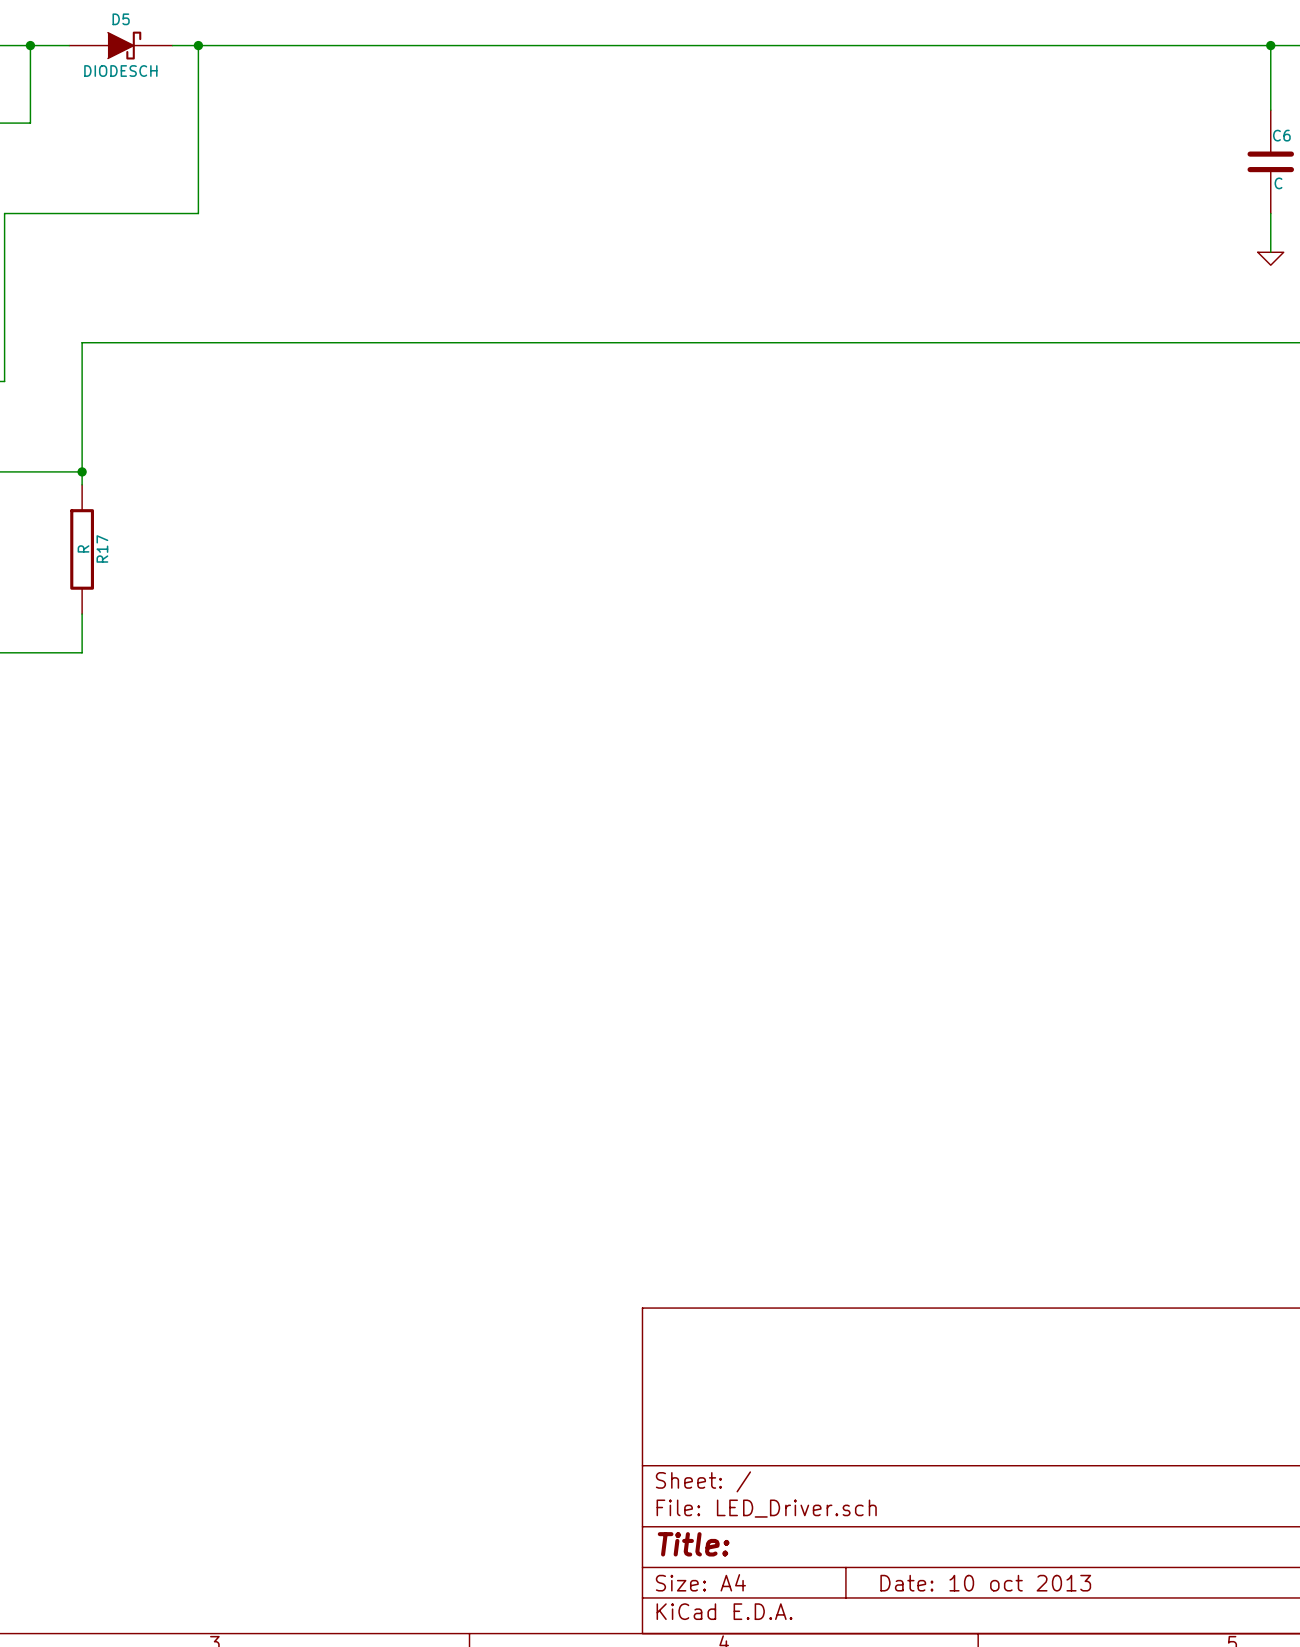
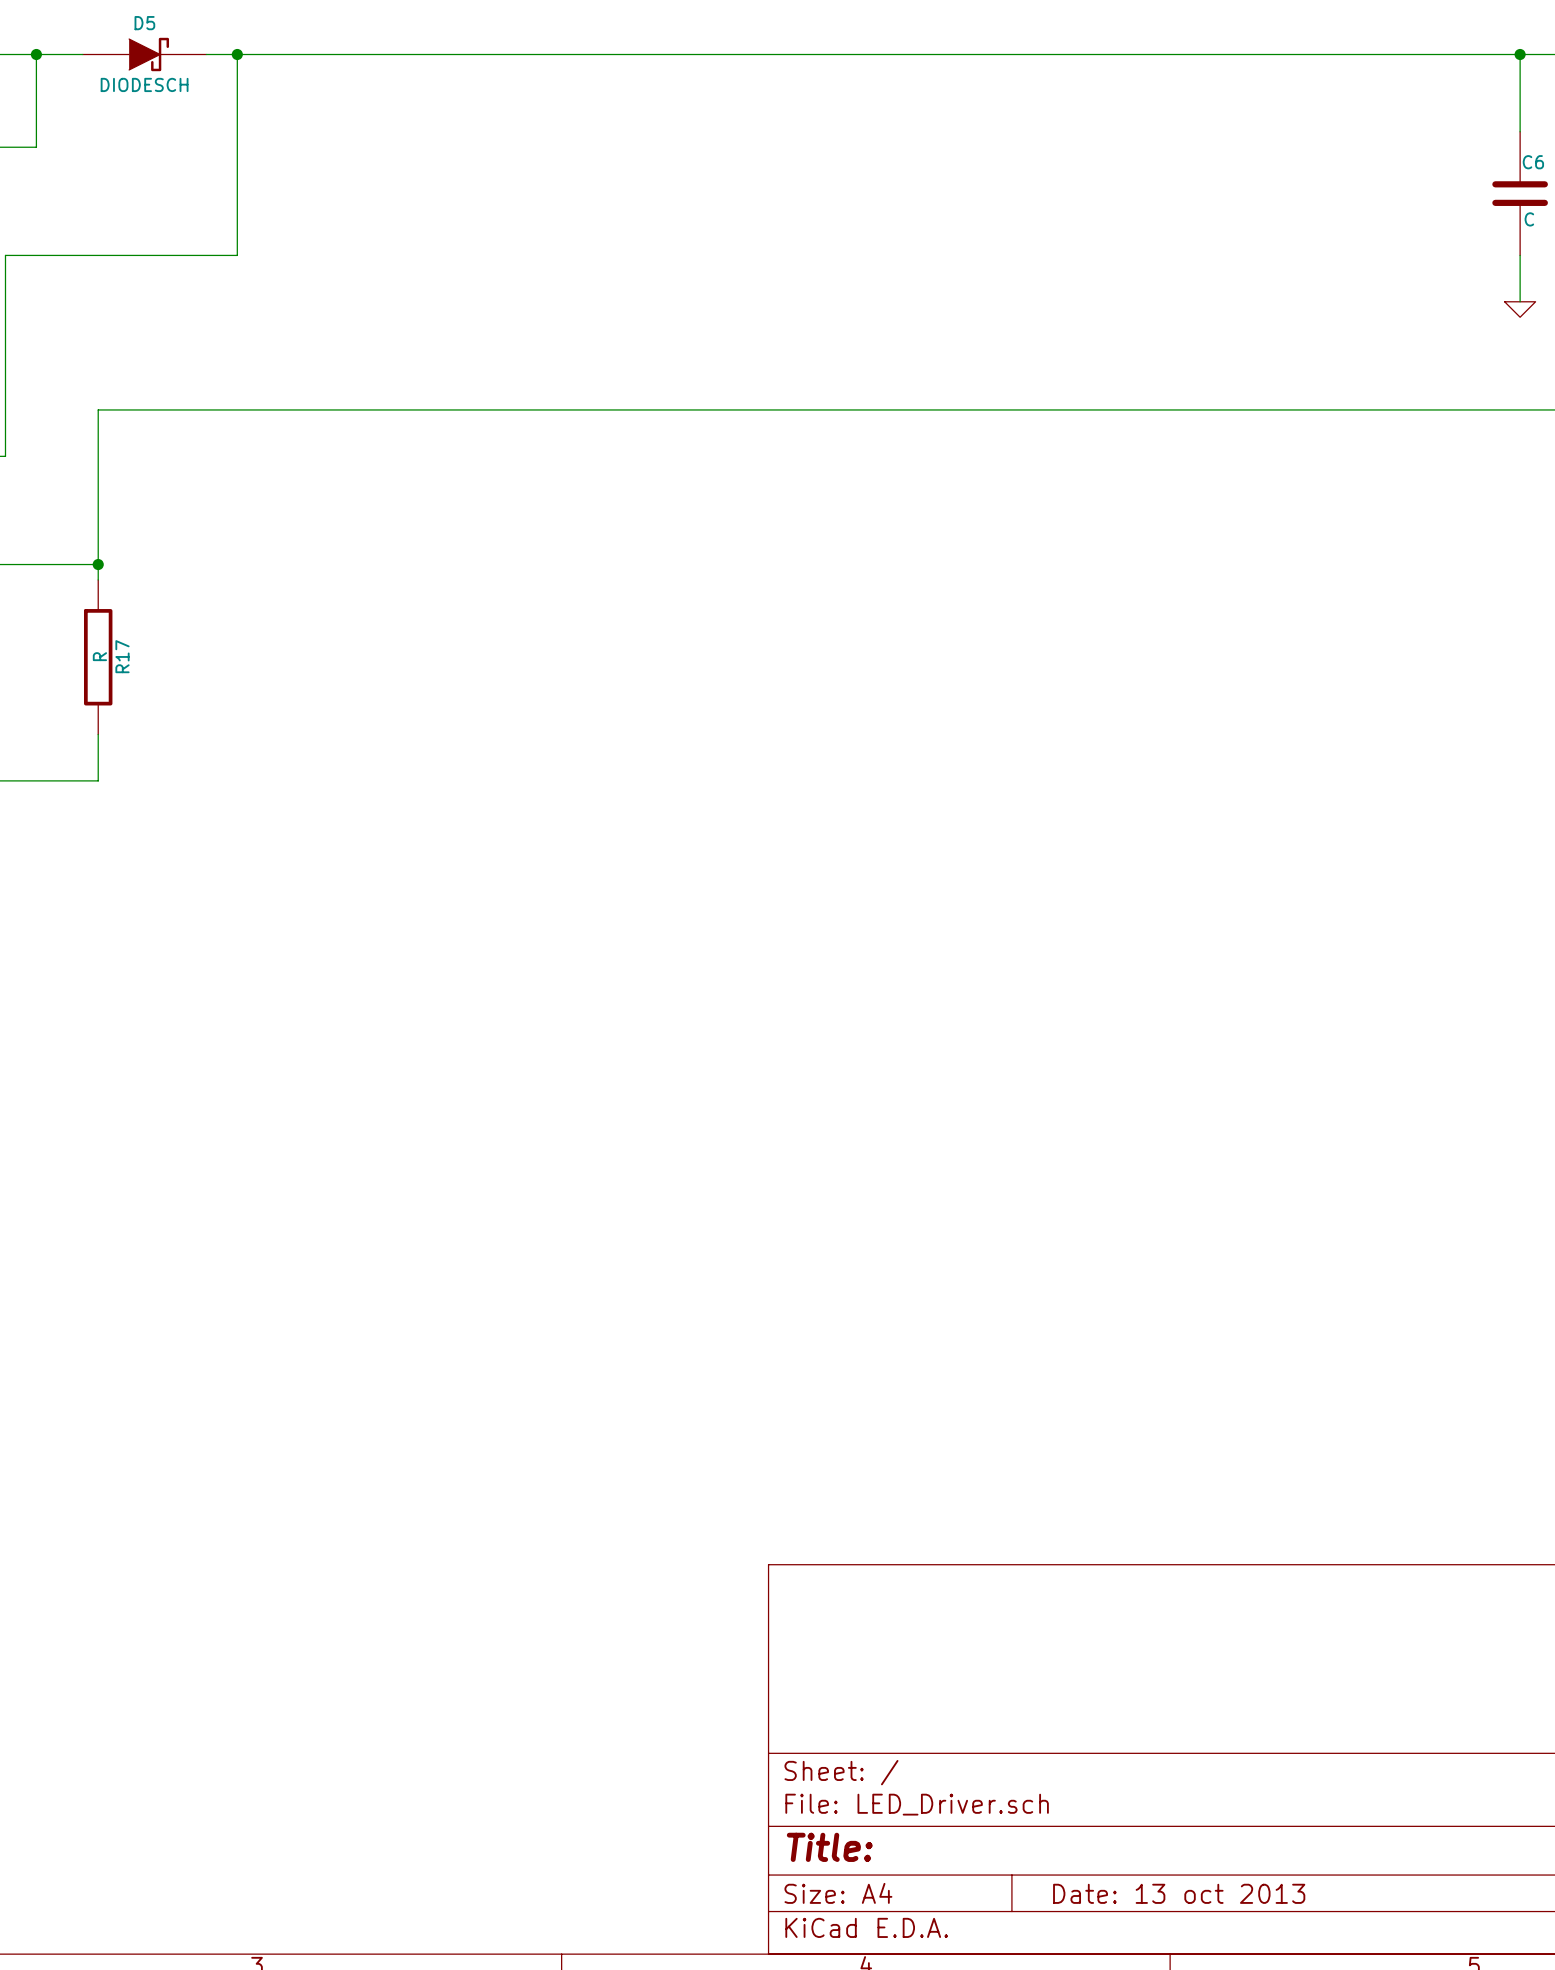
title block: Date: 10 oct 2013 (985, 1583) -> Date: 13 oct 2013 (1179, 1893)

